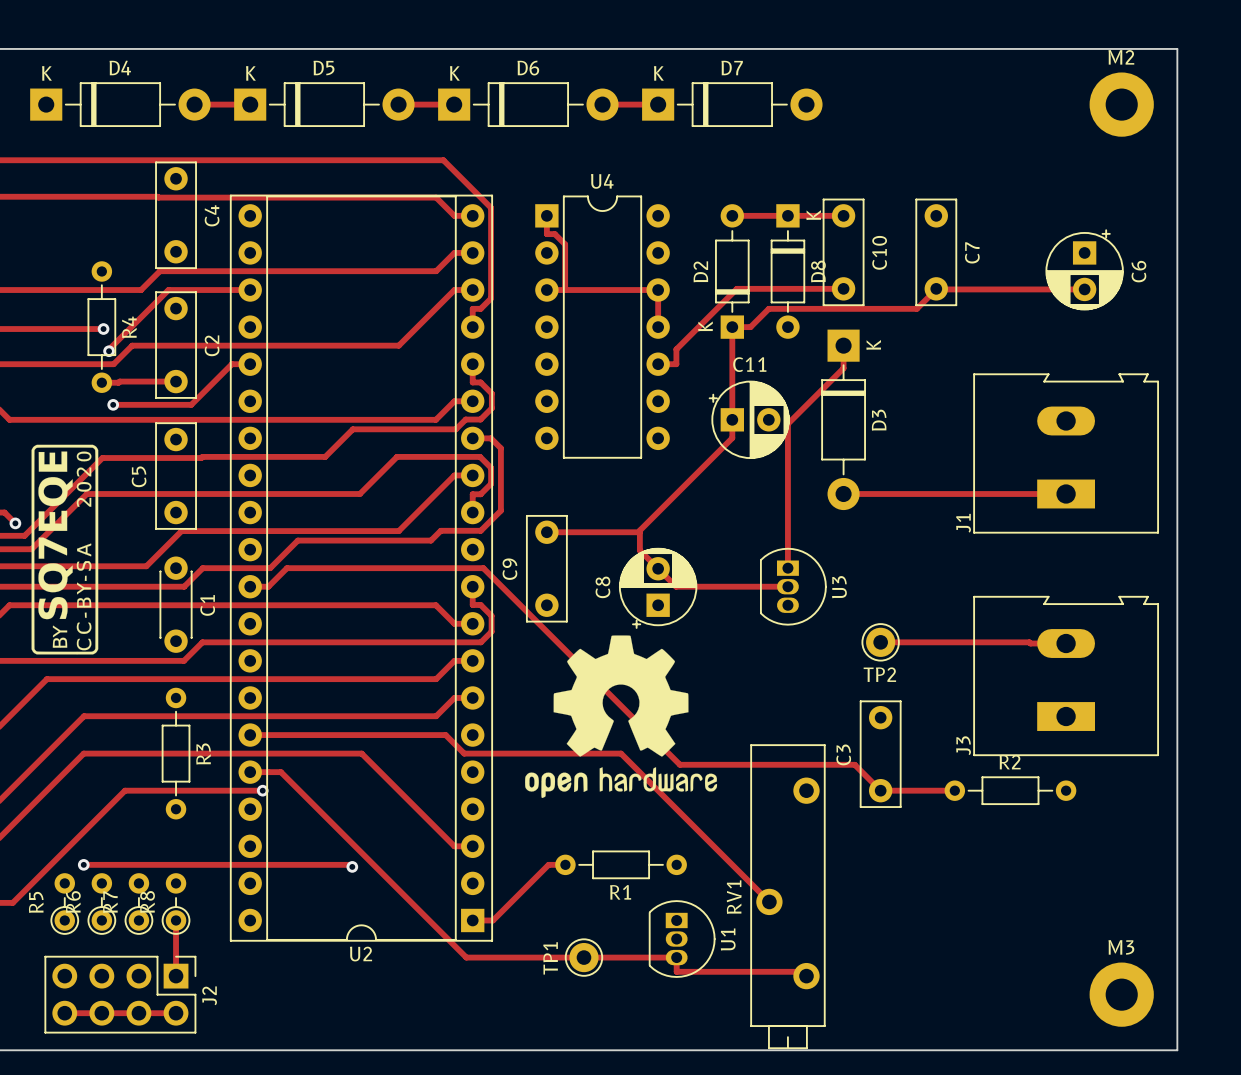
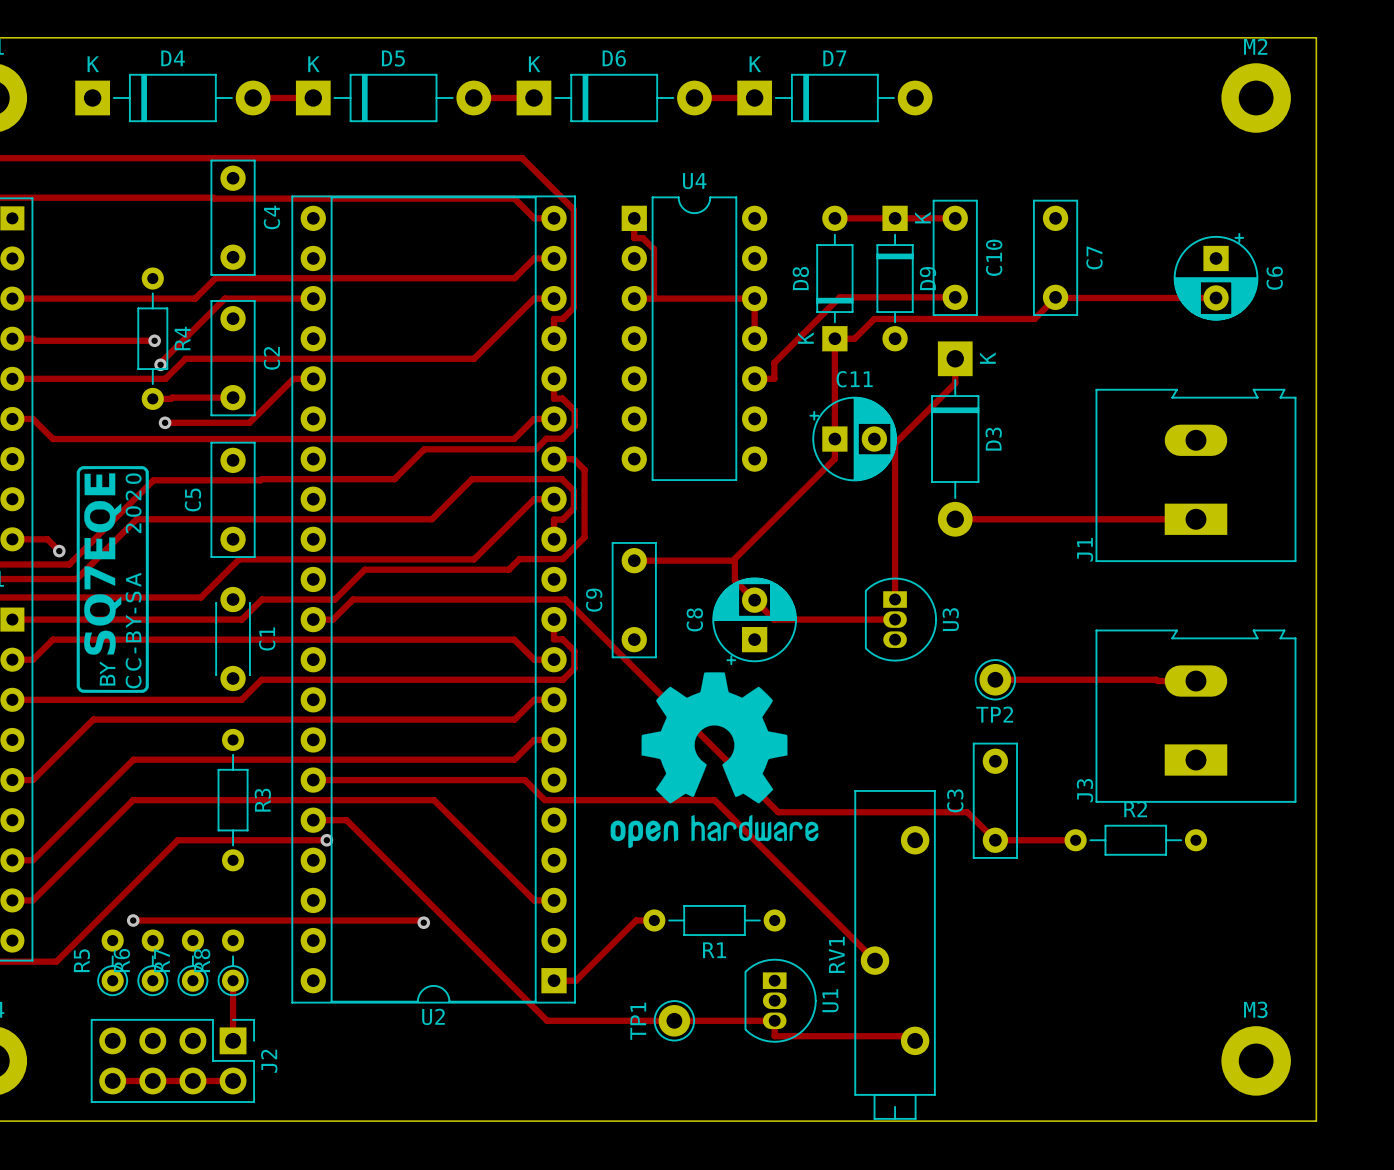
D2 name: D2 (700, 271) -> D8 (800, 278)
D8 name: D8 (818, 271) -> D9 (927, 278)

